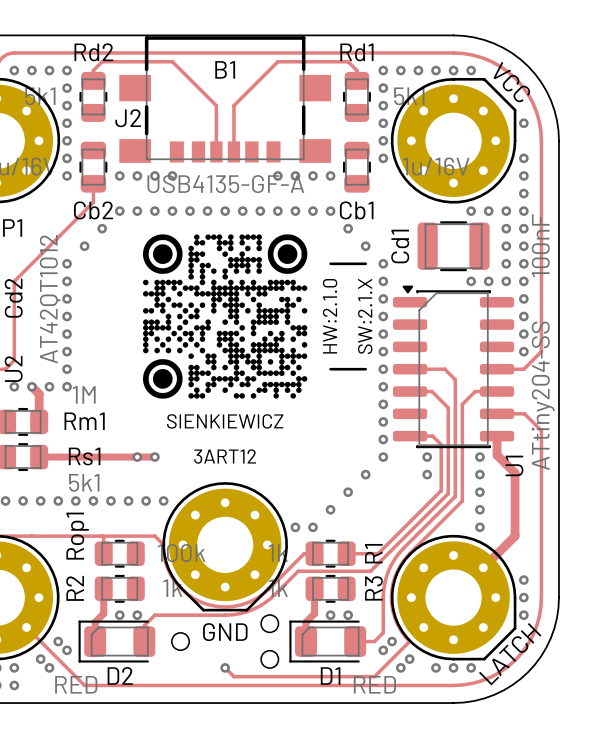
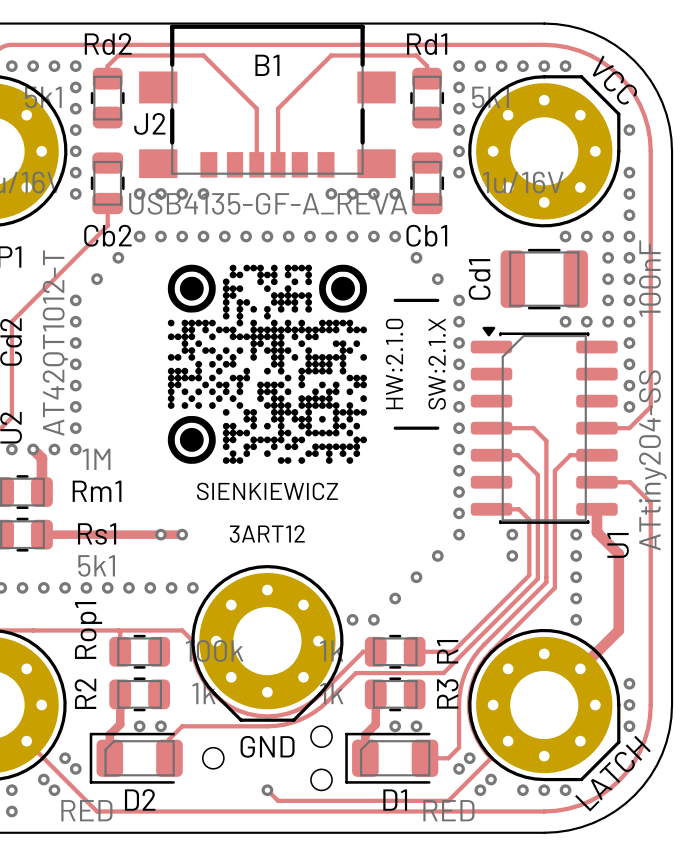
J2 value: USB4135-GF-A (225, 184) -> USB4135-GF-A_REVA (268, 203)
U2 value: AT42QT1012 (50, 299) -> AT42QT1012-T (55, 343)

